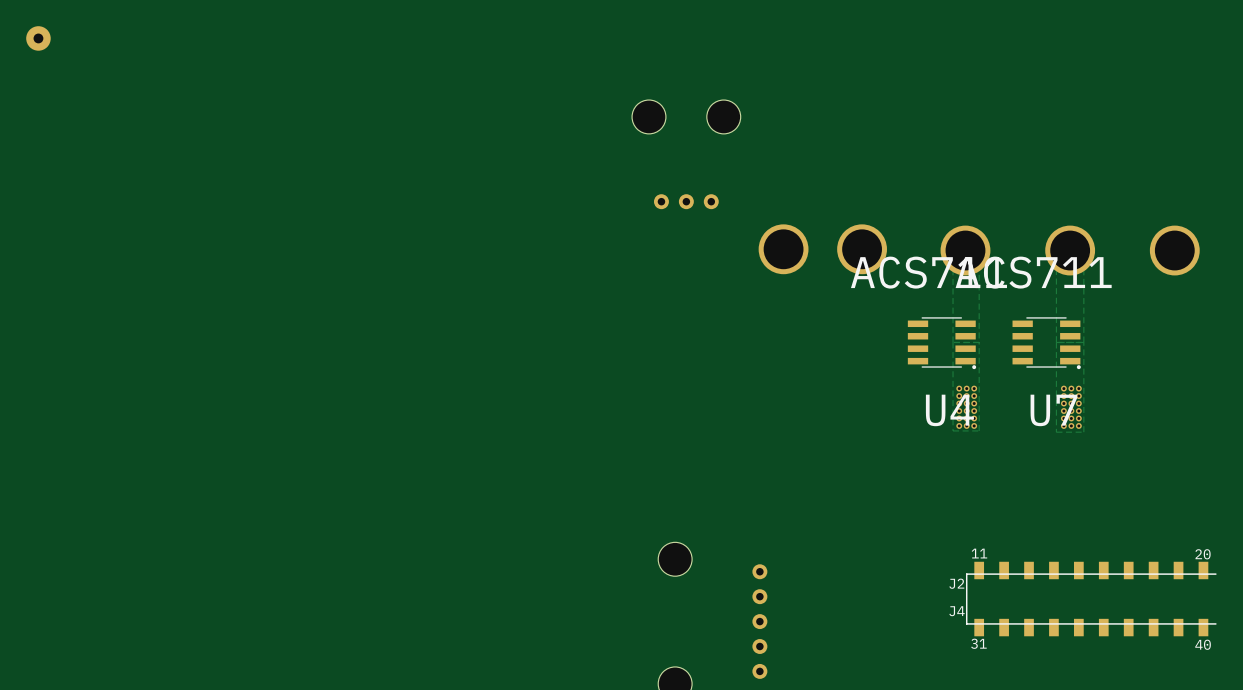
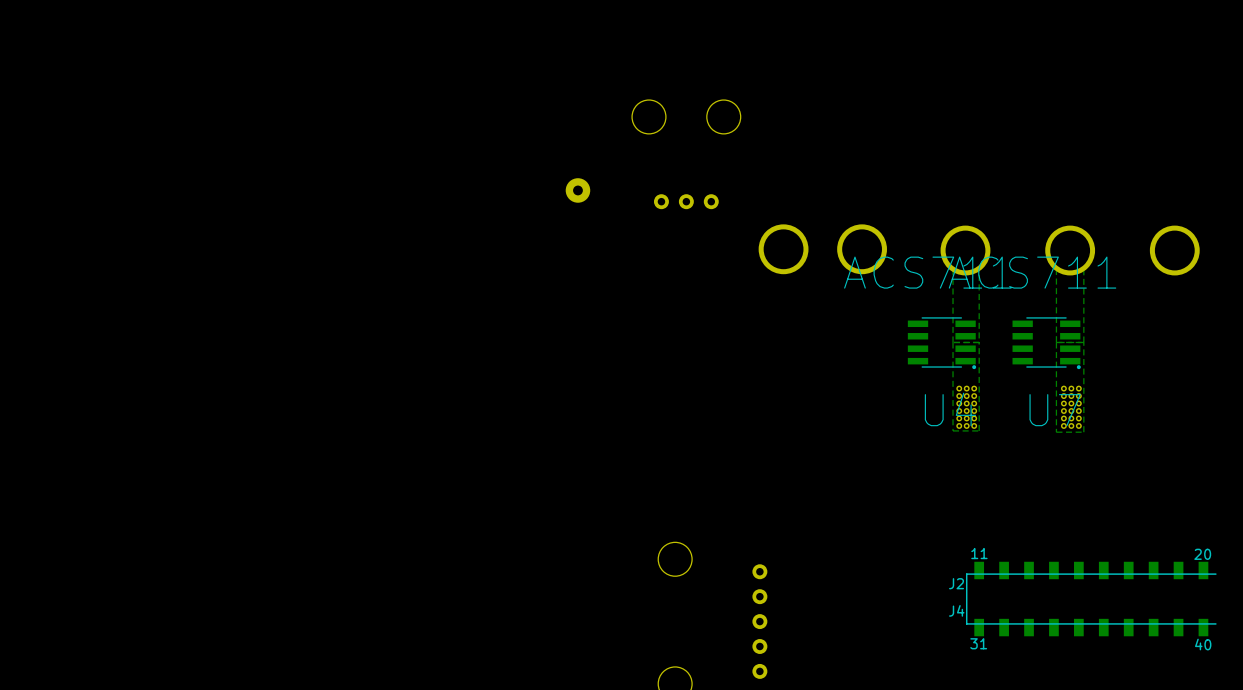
part: (38, 38) -> none
part: none -> (577, 190)

